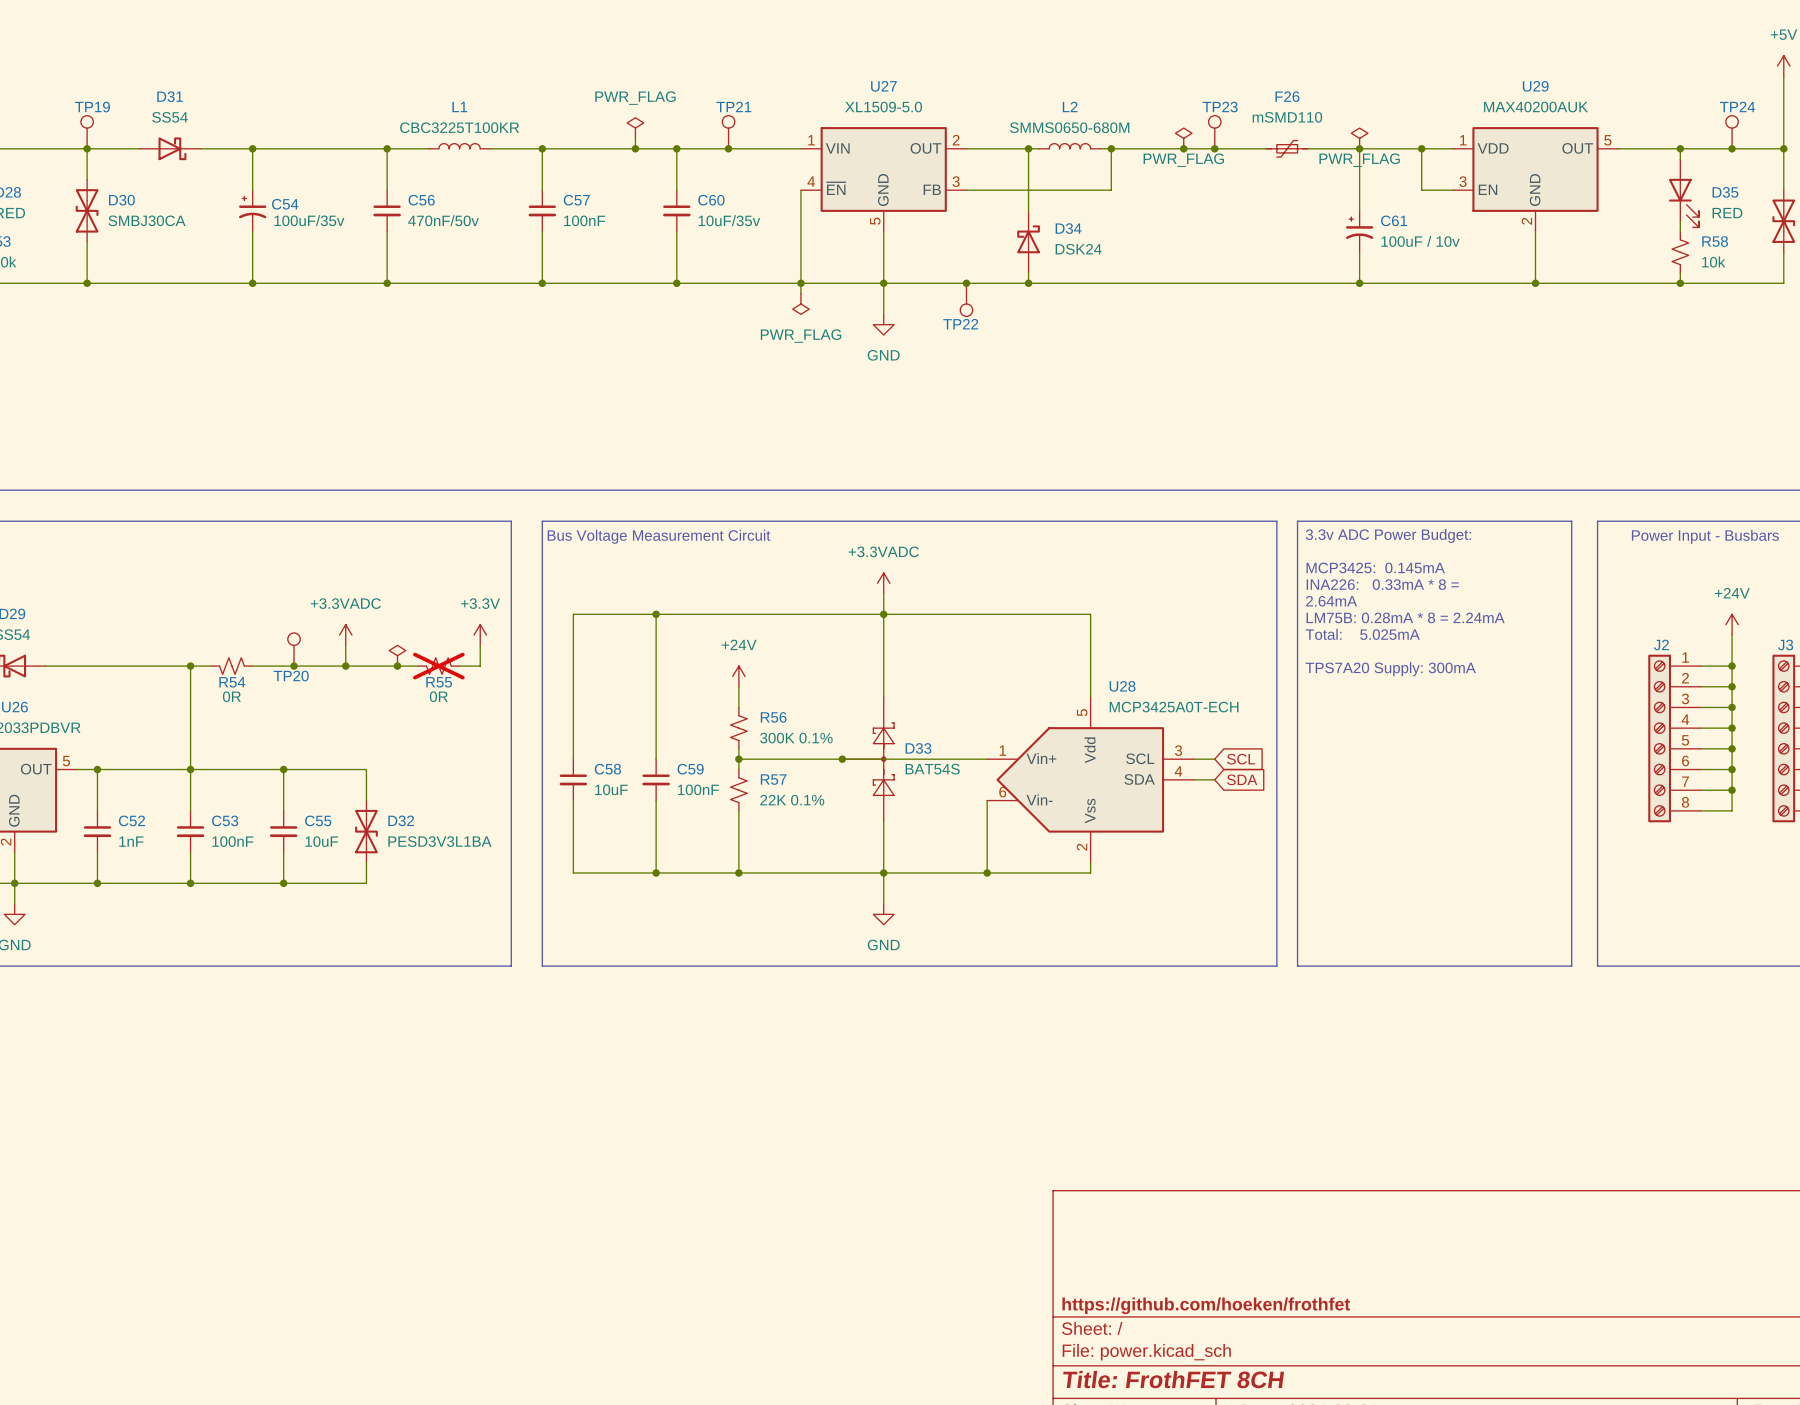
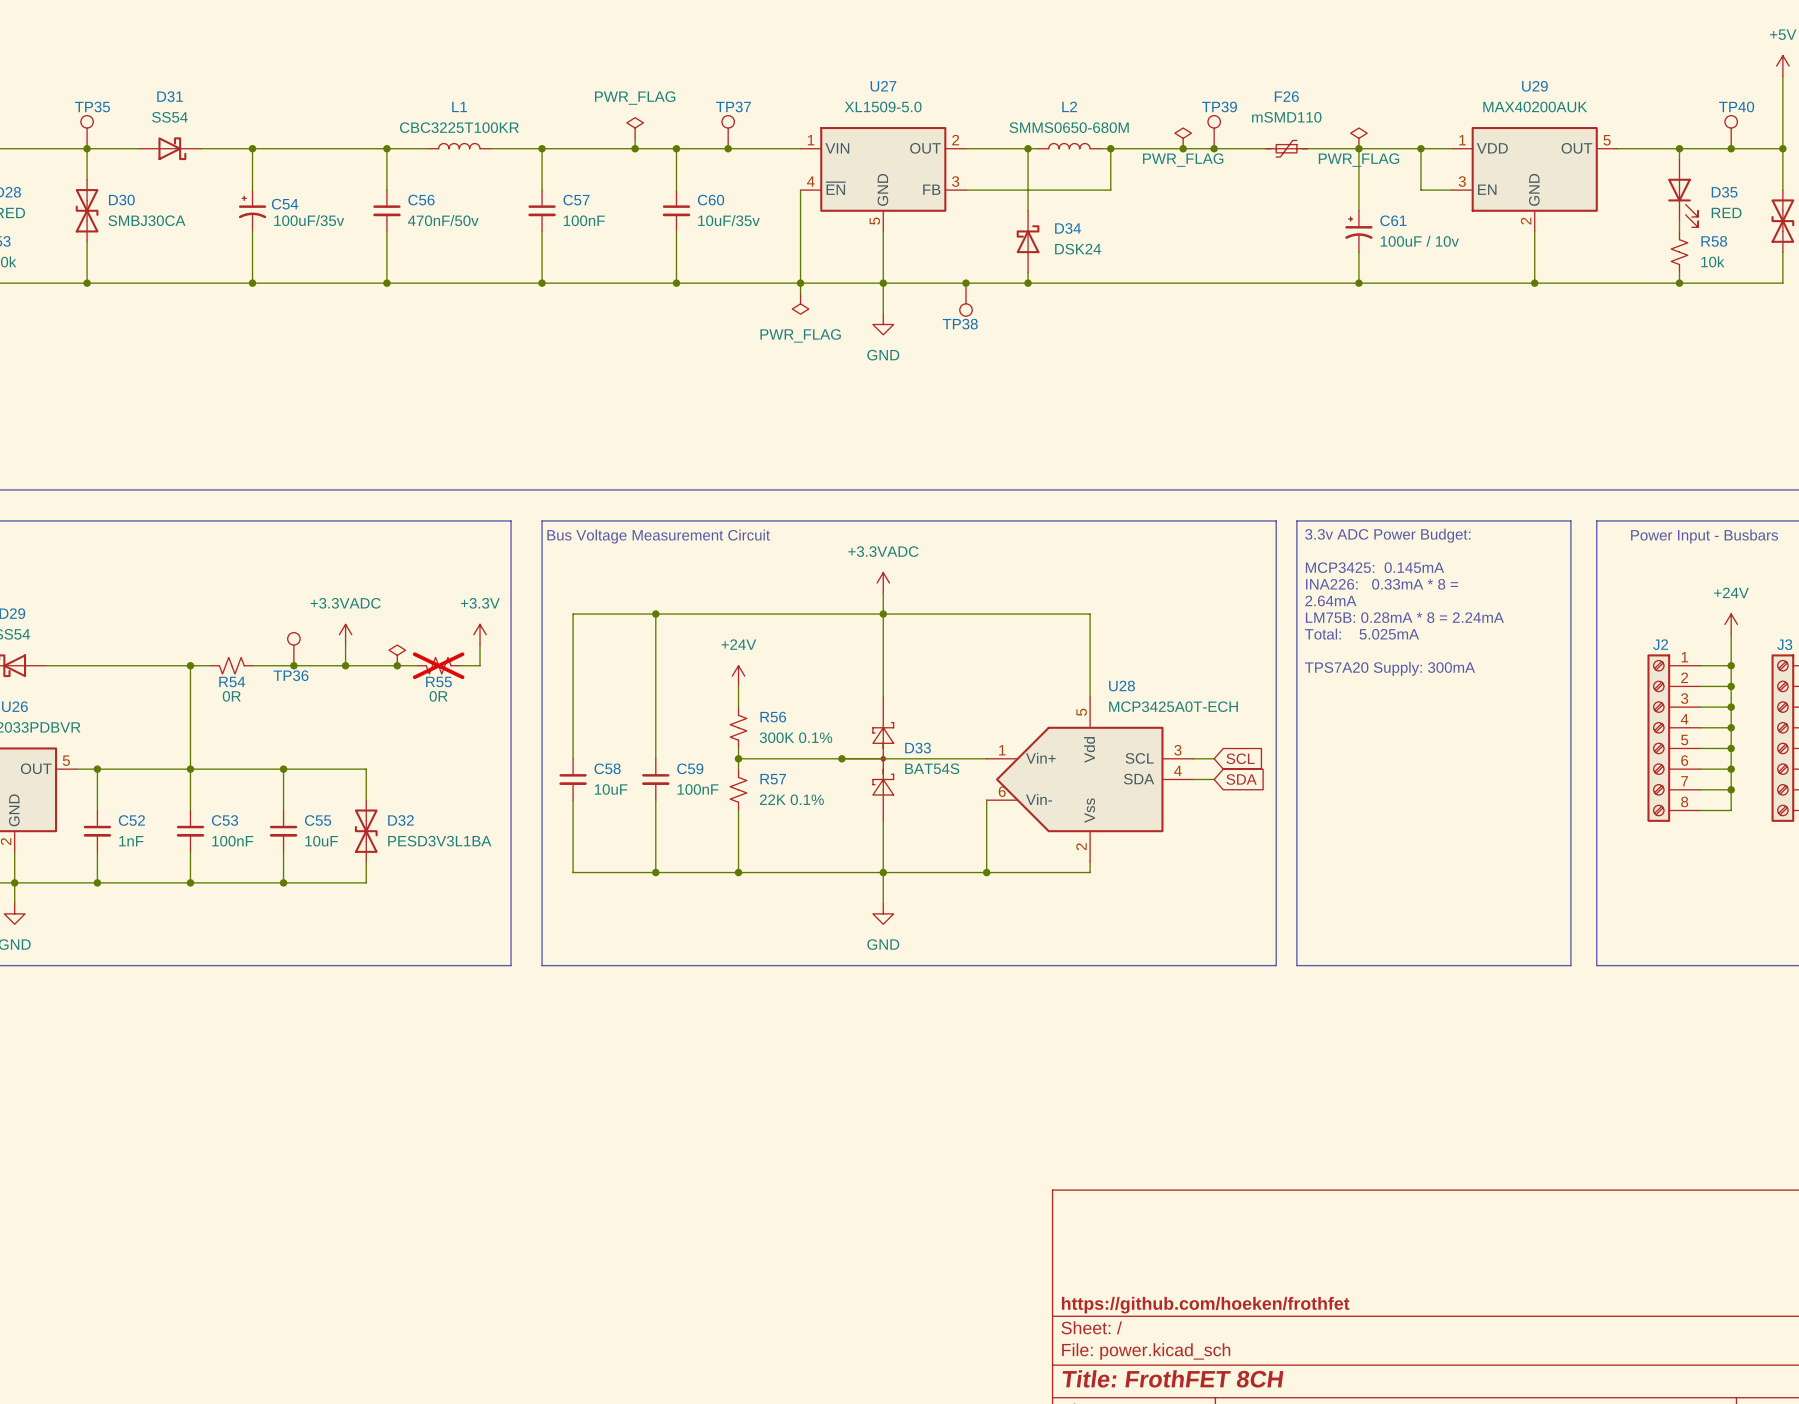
TP21 name: TP21 (733, 106) -> TP37 (733, 106)
TP24 name: TP24 (1737, 106) -> TP40 (1736, 106)
TP19 name: TP19 (92, 107) -> TP35 (92, 106)
TP23 name: TP23 (1220, 107) -> TP39 (1219, 106)
TP22 name: TP22 (960, 324) -> TP38 (960, 324)
TP20 name: TP20 (291, 676) -> TP36 (291, 675)

